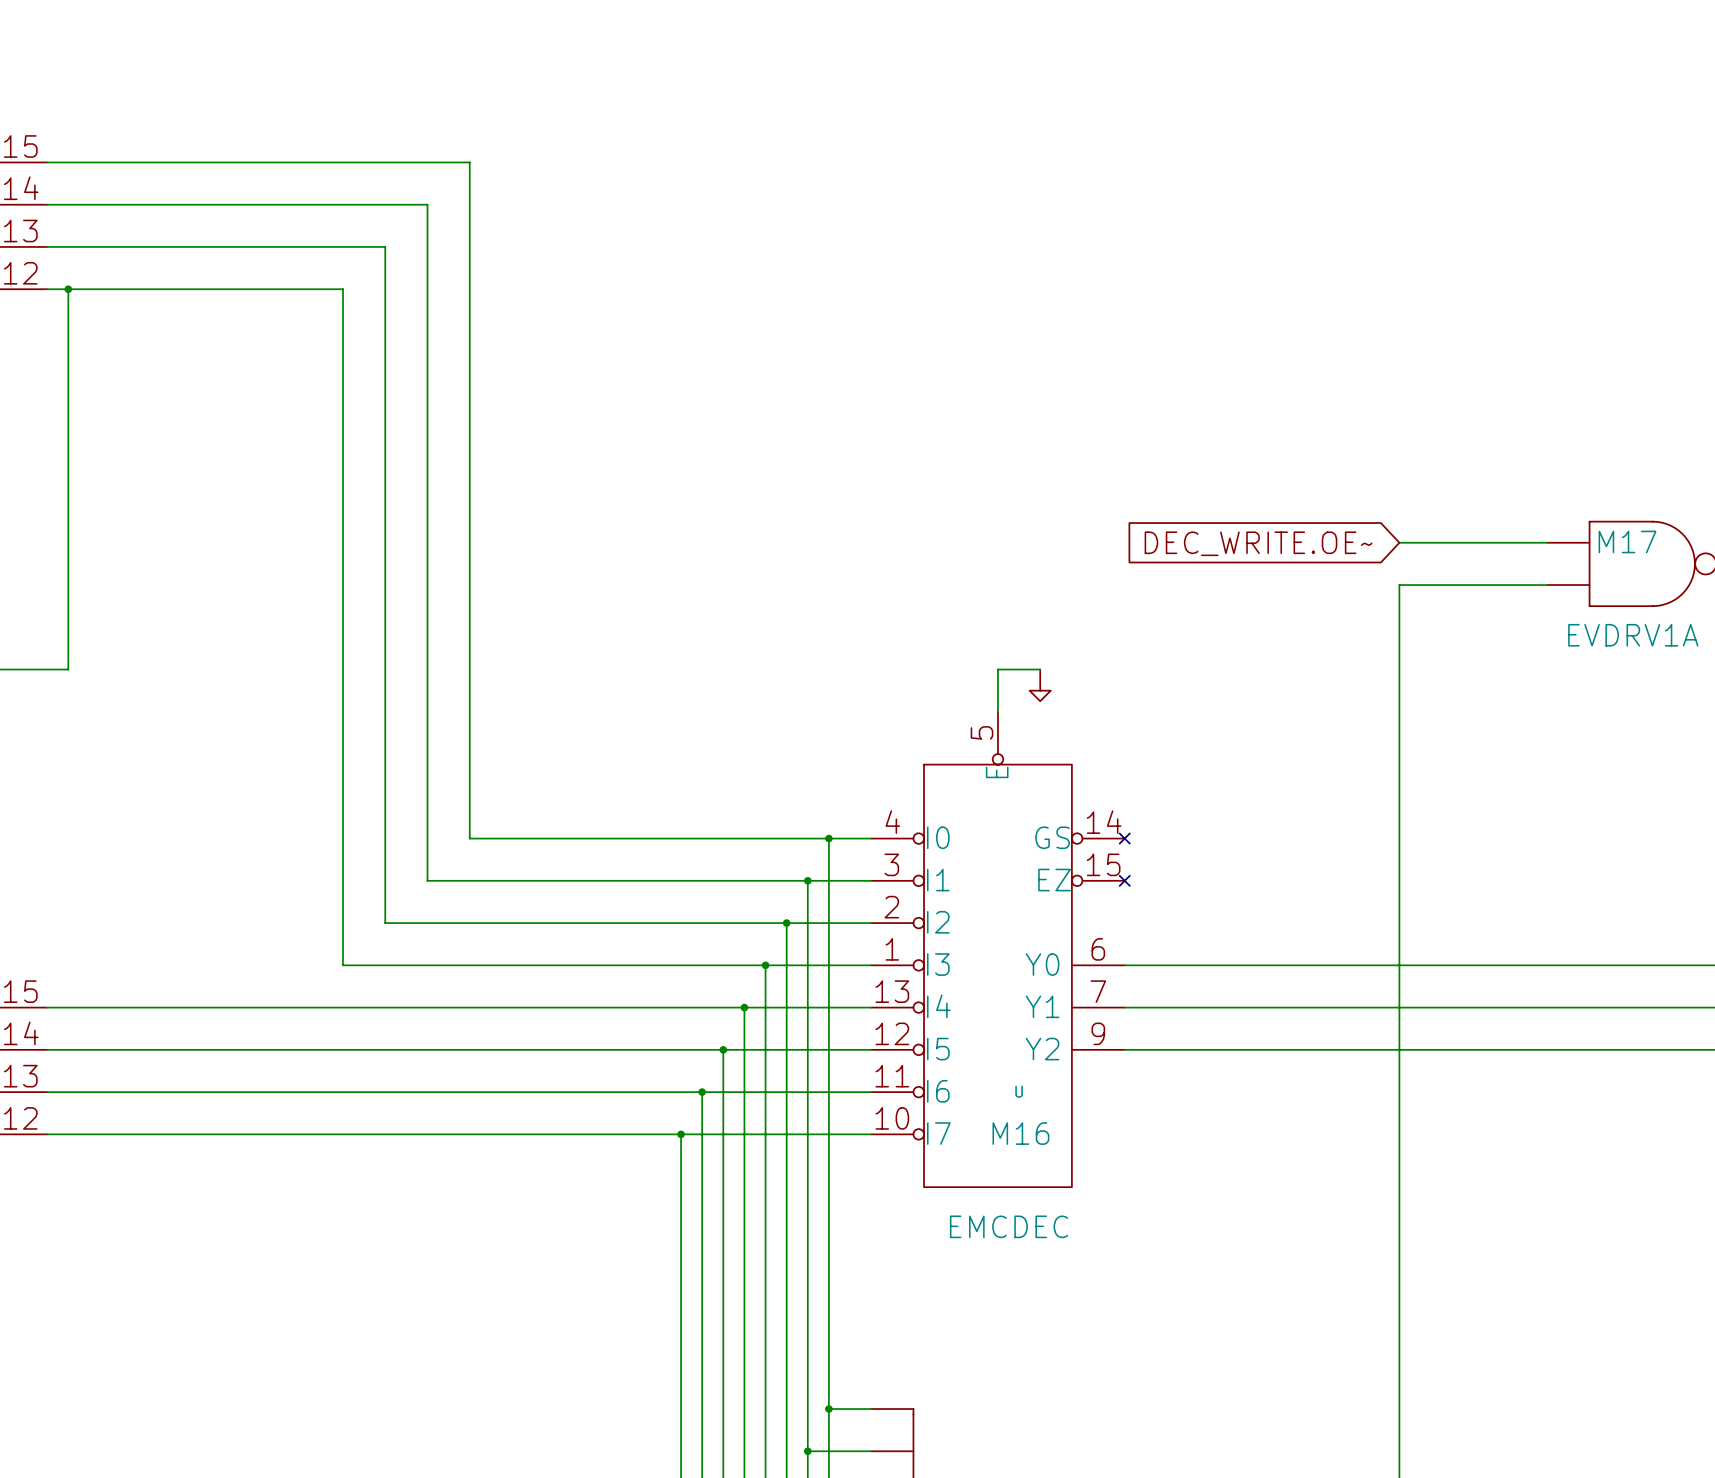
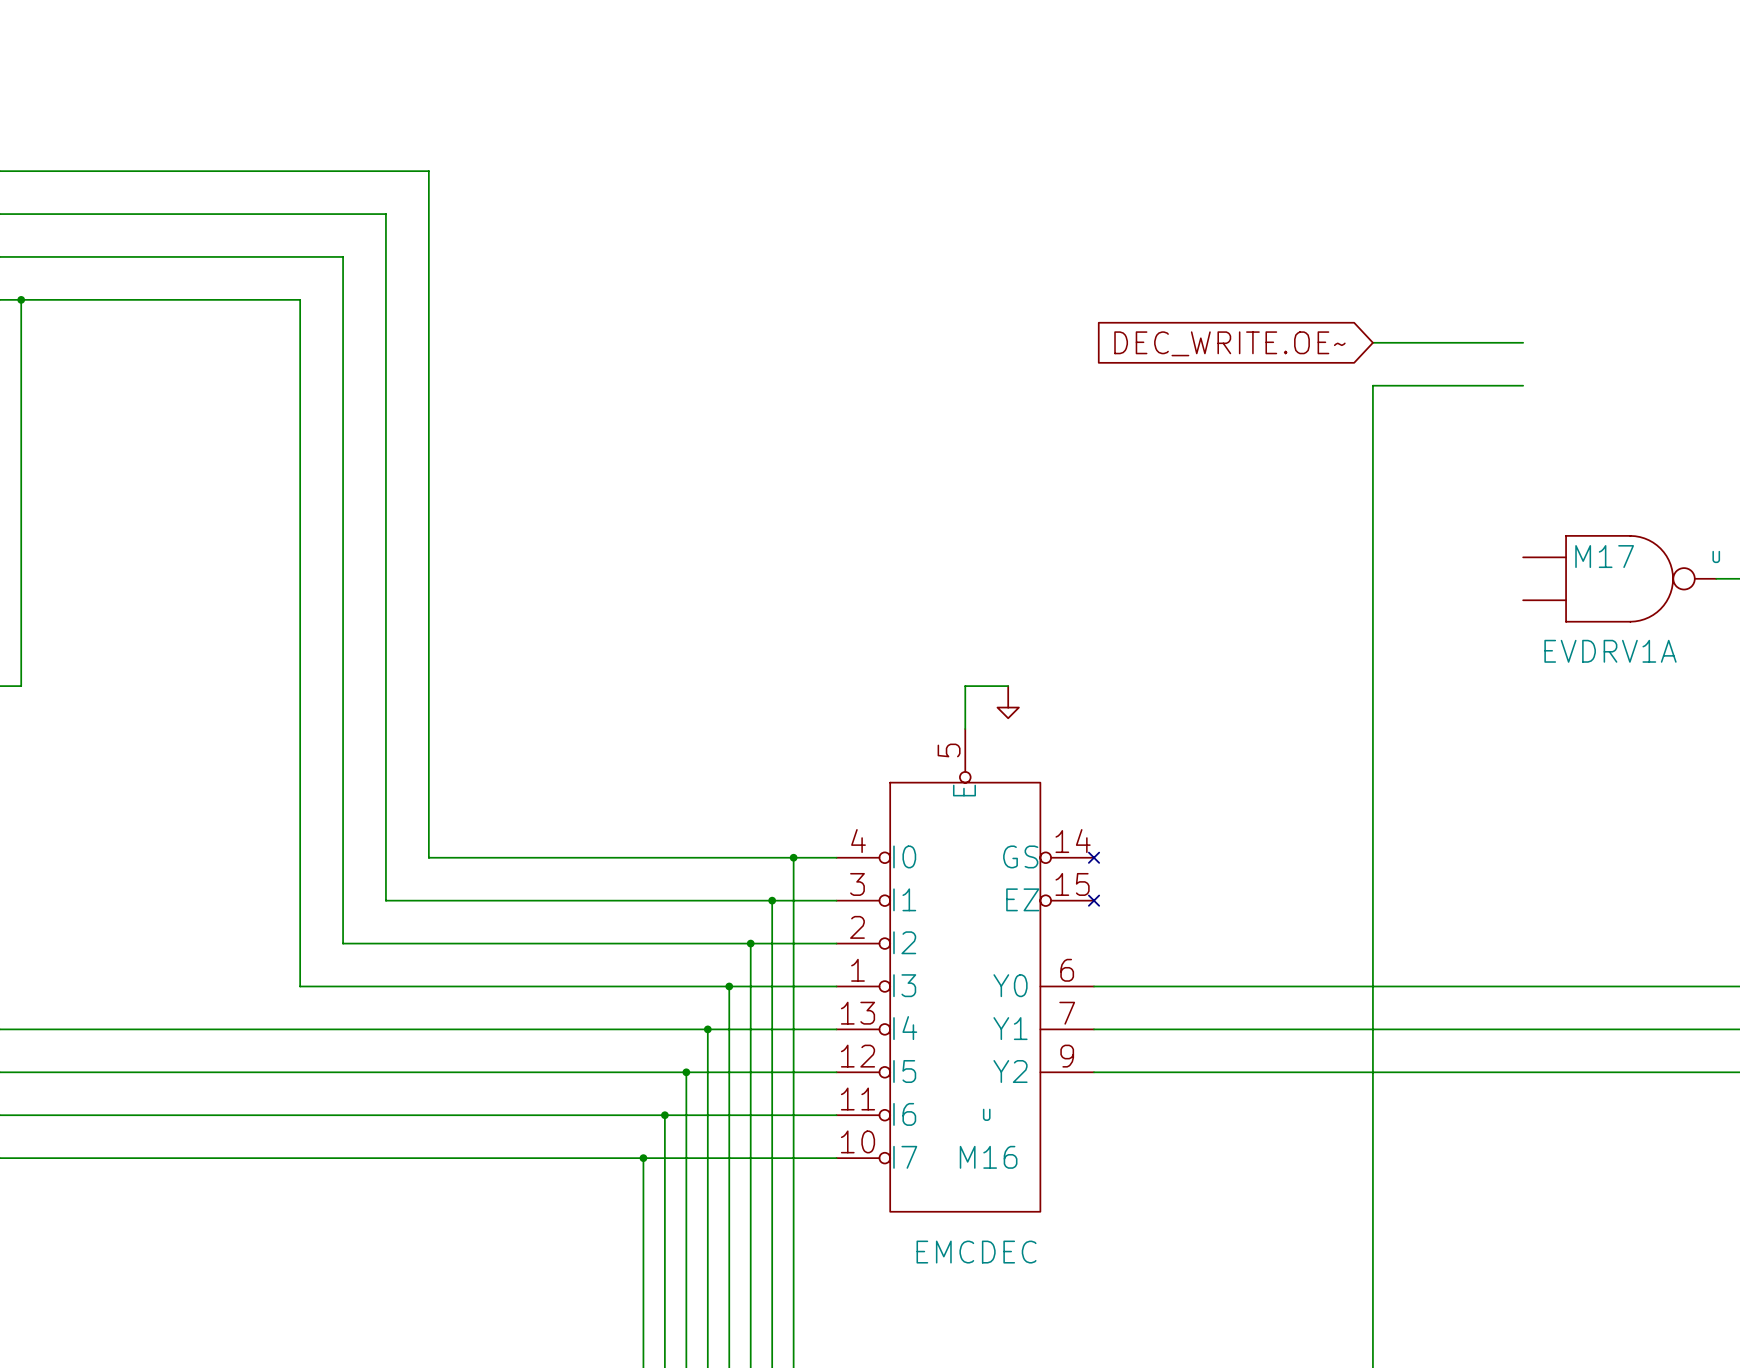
wire: none -> (1372, 342) (1523, 342)
global label: none -> DEC_WRITE.OE~ (1229, 343)
wire: (1399, 542) (1547, 542) -> none
global label: DEC_WRITE.OE~ (1258, 543) -> none
wire: (1399, 585) (1547, 585) -> (1372, 600) (1372, 385) (1523, 385)

